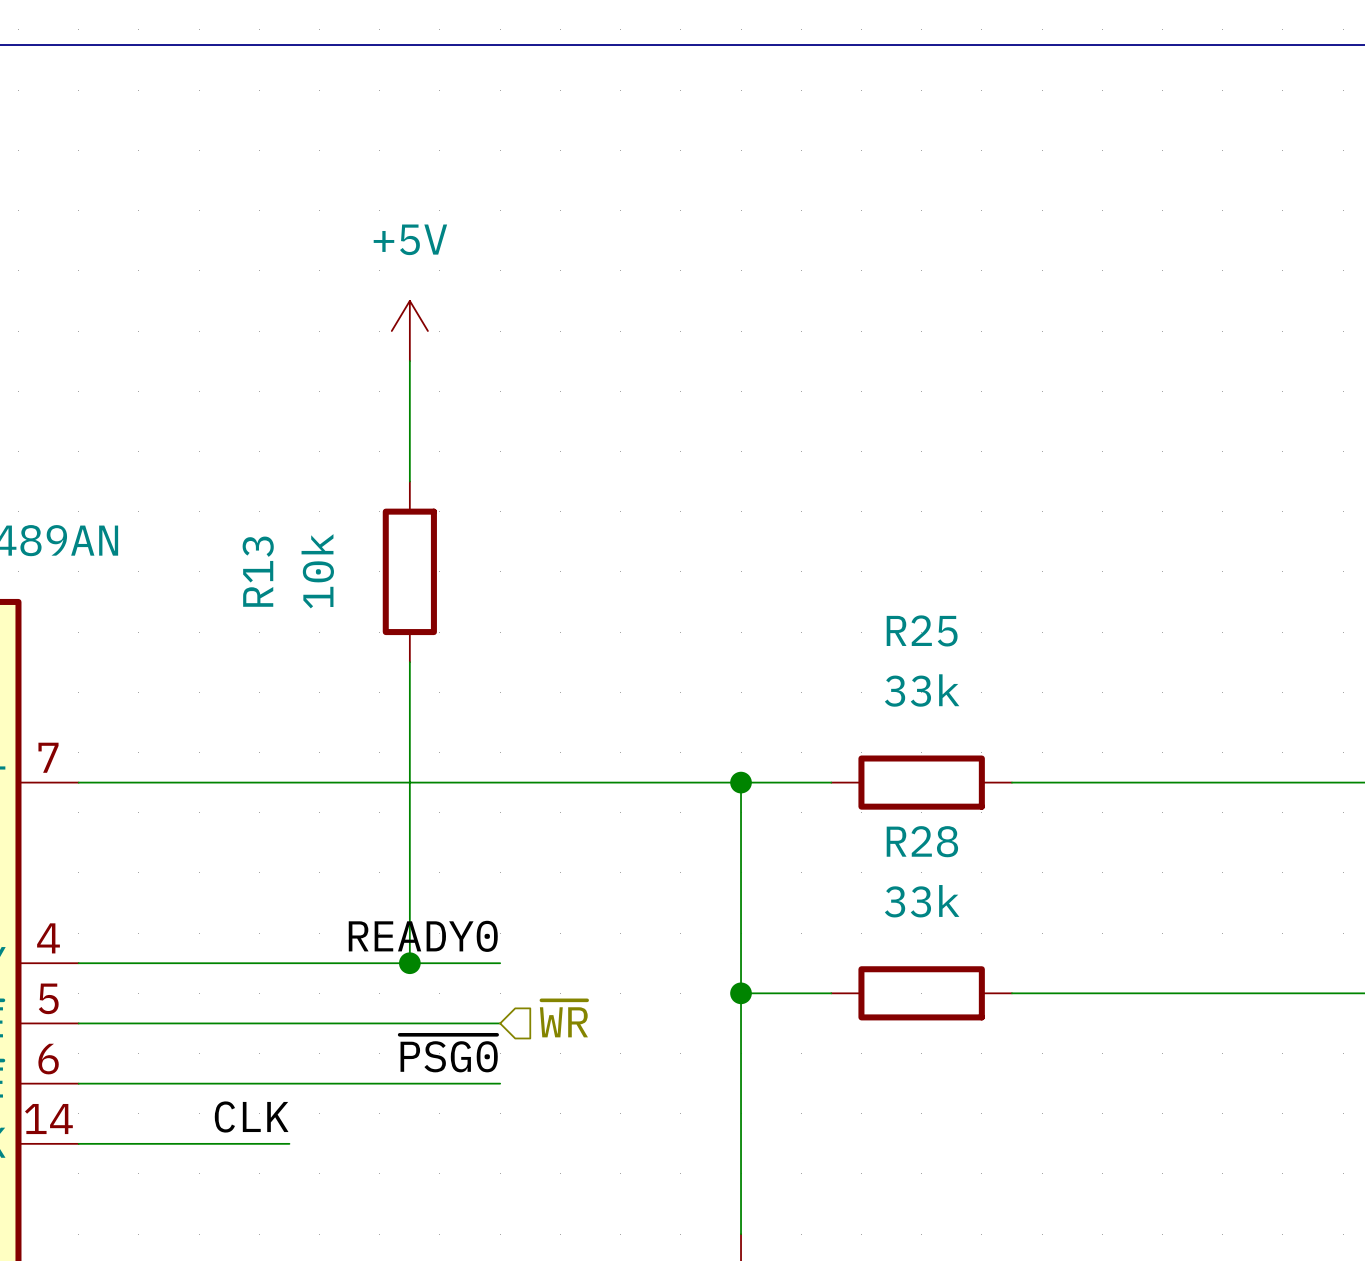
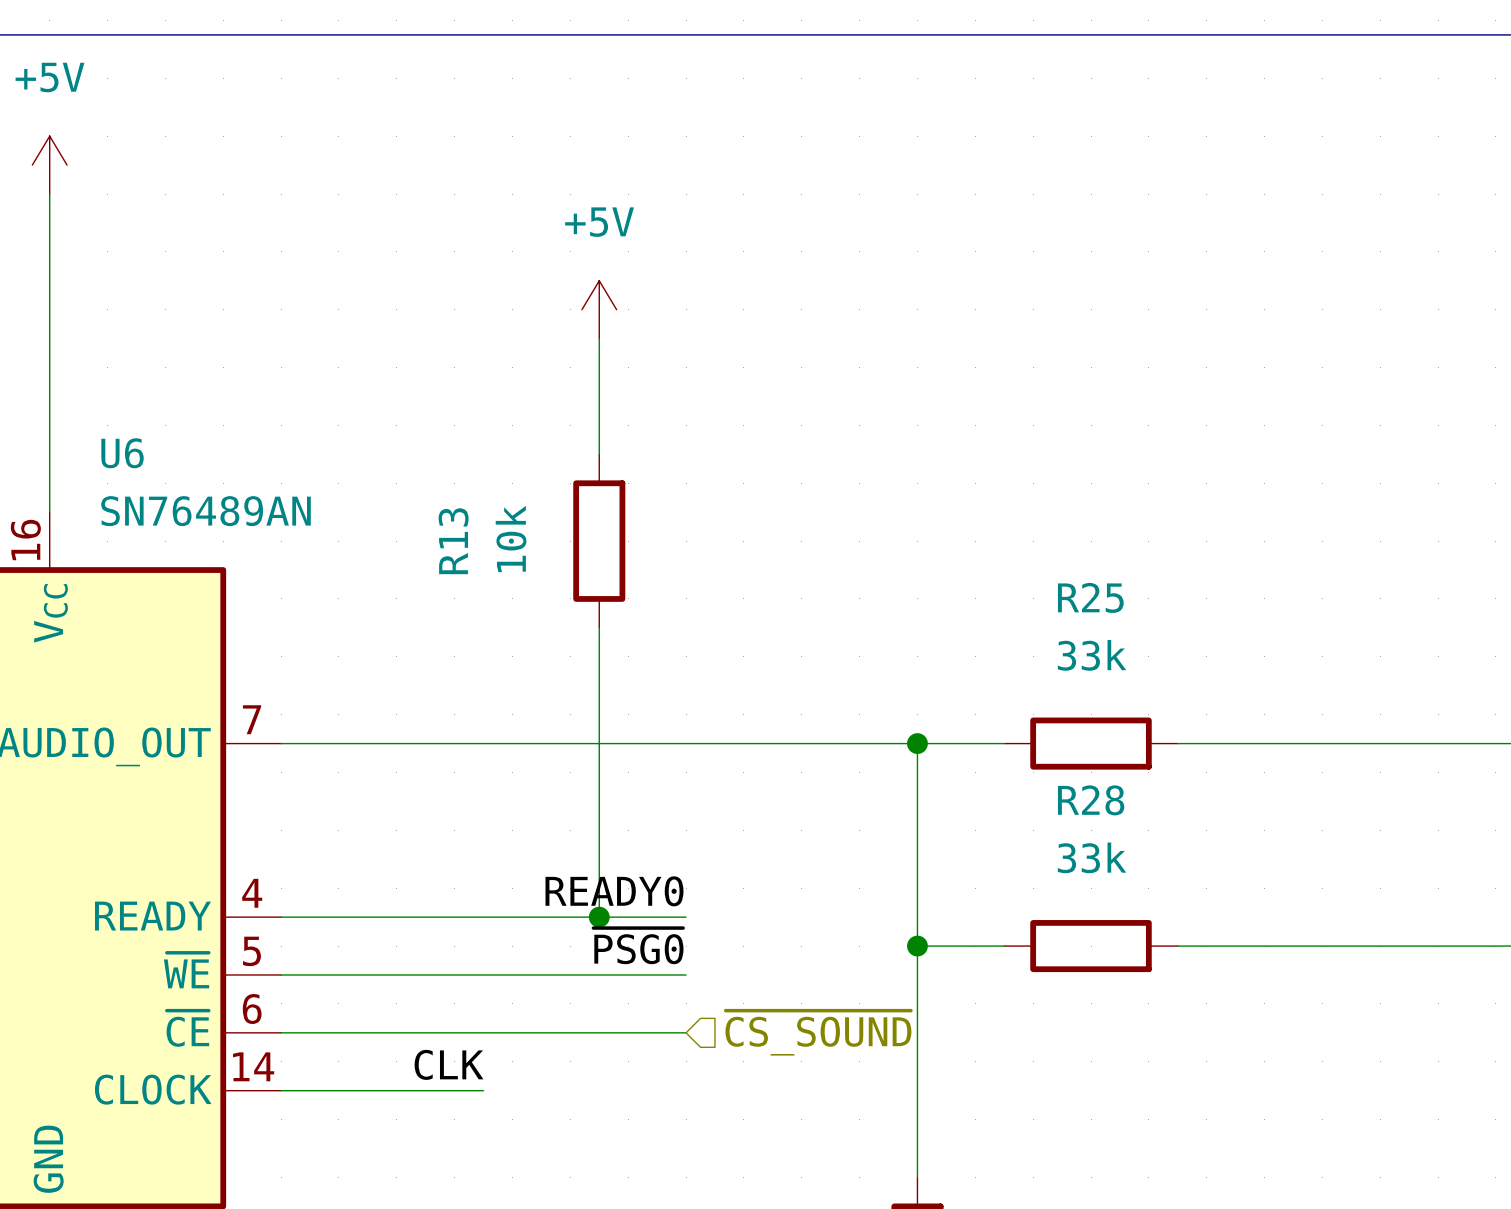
hierarchical label: ~{WR} (563, 1018) -> none
label position: ~{PSG0} (448, 1053) -> ~{PSG0} (638, 946)
hierarchical label: none -> ~{CS_SOUND} (818, 1033)

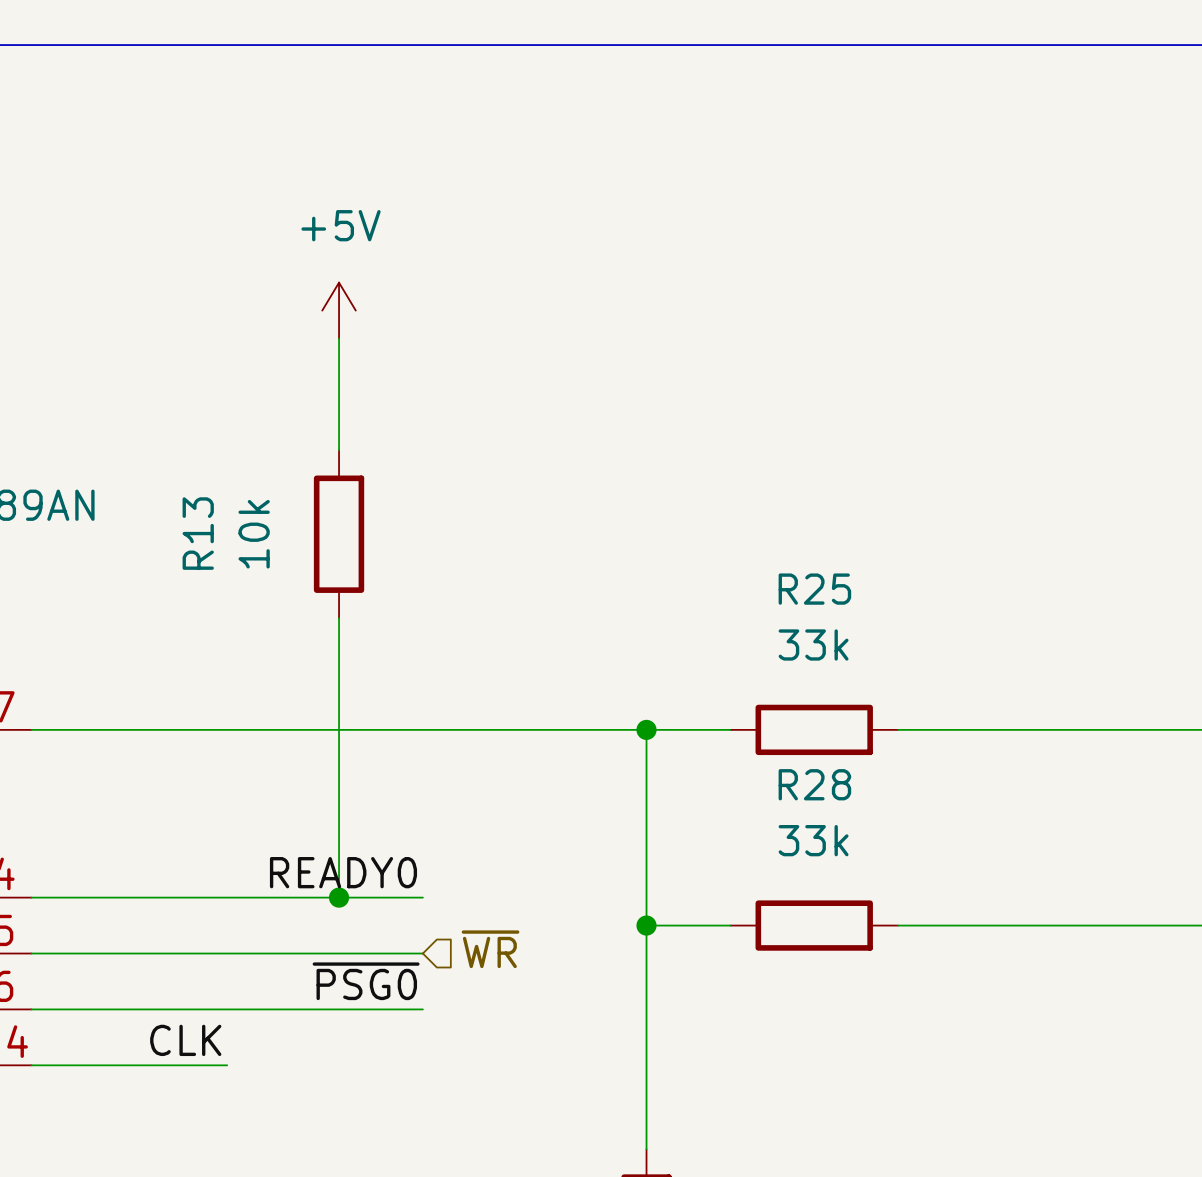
label position: ~{PSG0} (638, 946) -> ~{PSG0} (366, 981)
hierarchical label: none -> ~{WR} (490, 949)
hierarchical label: ~{CS_SOUND} (818, 1033) -> none

